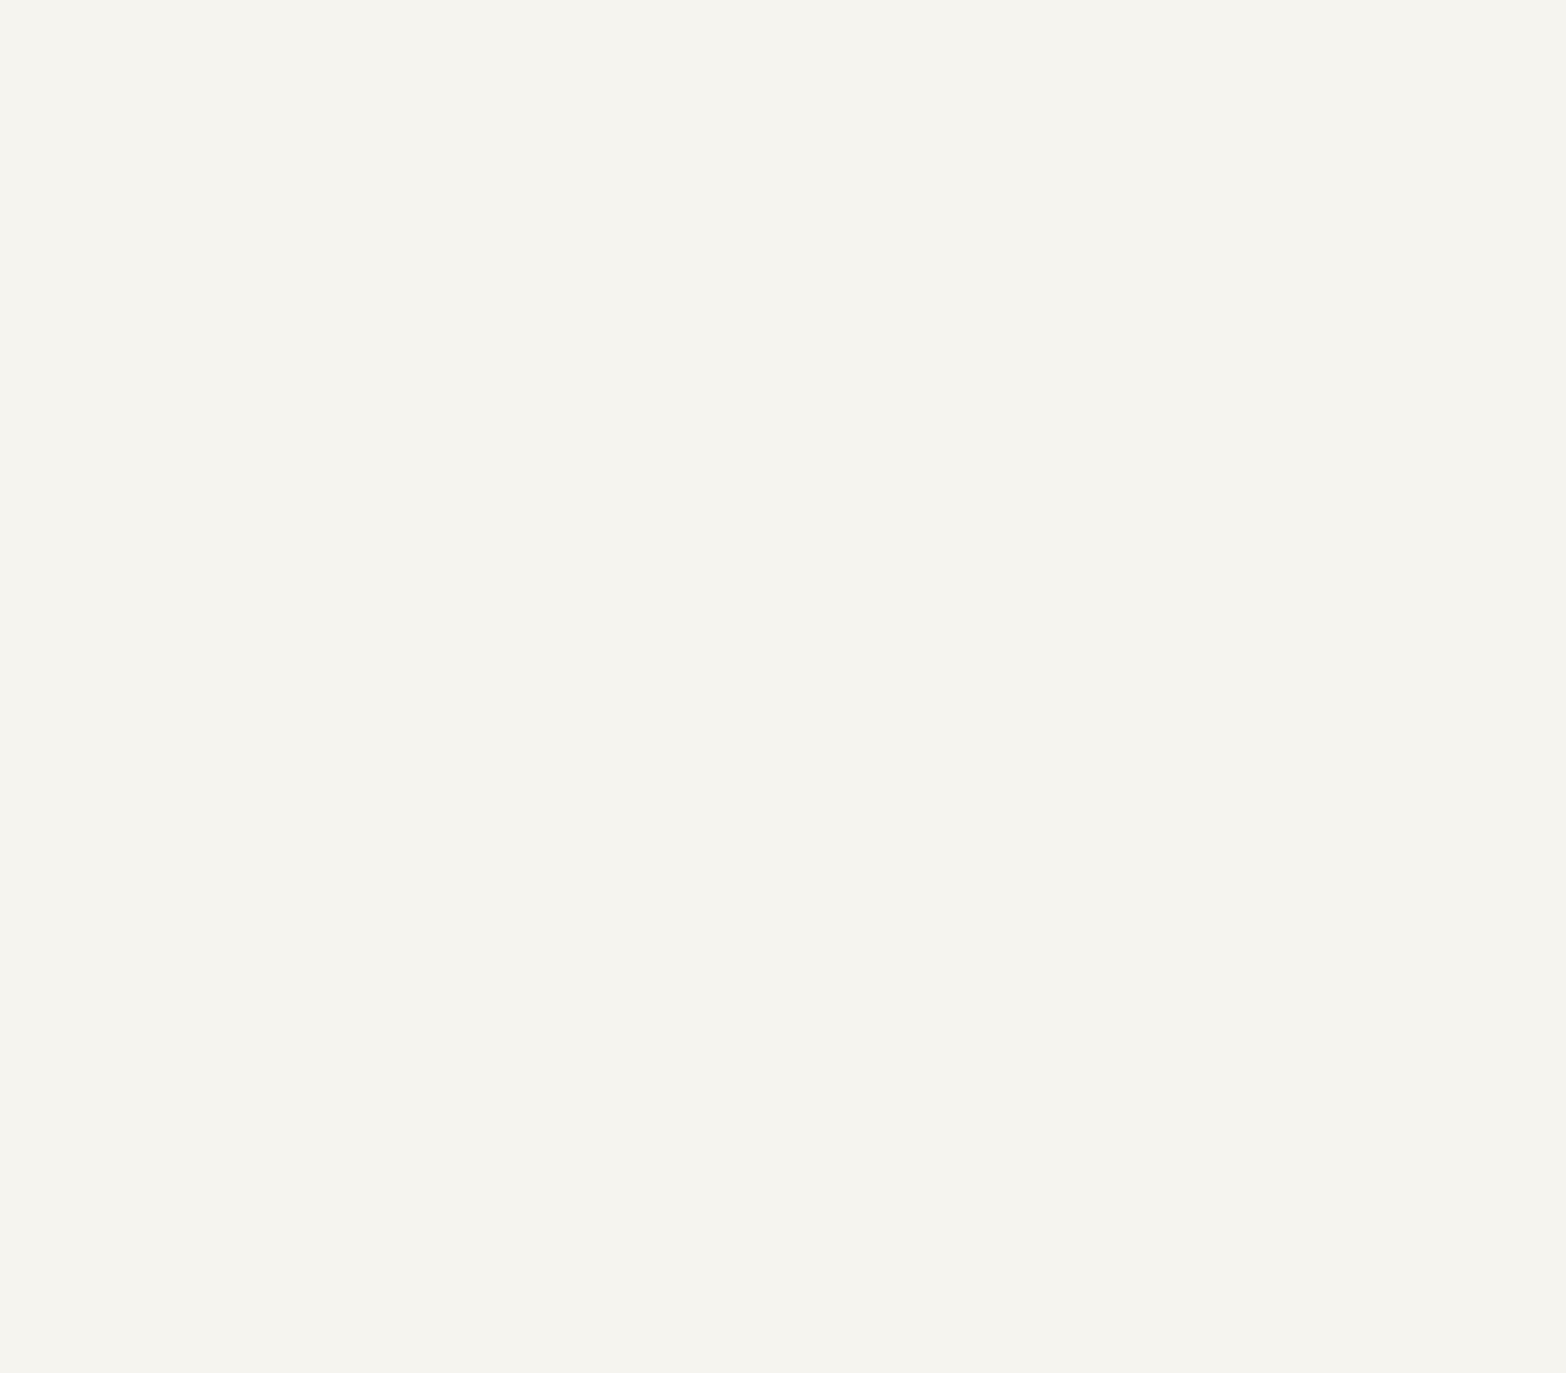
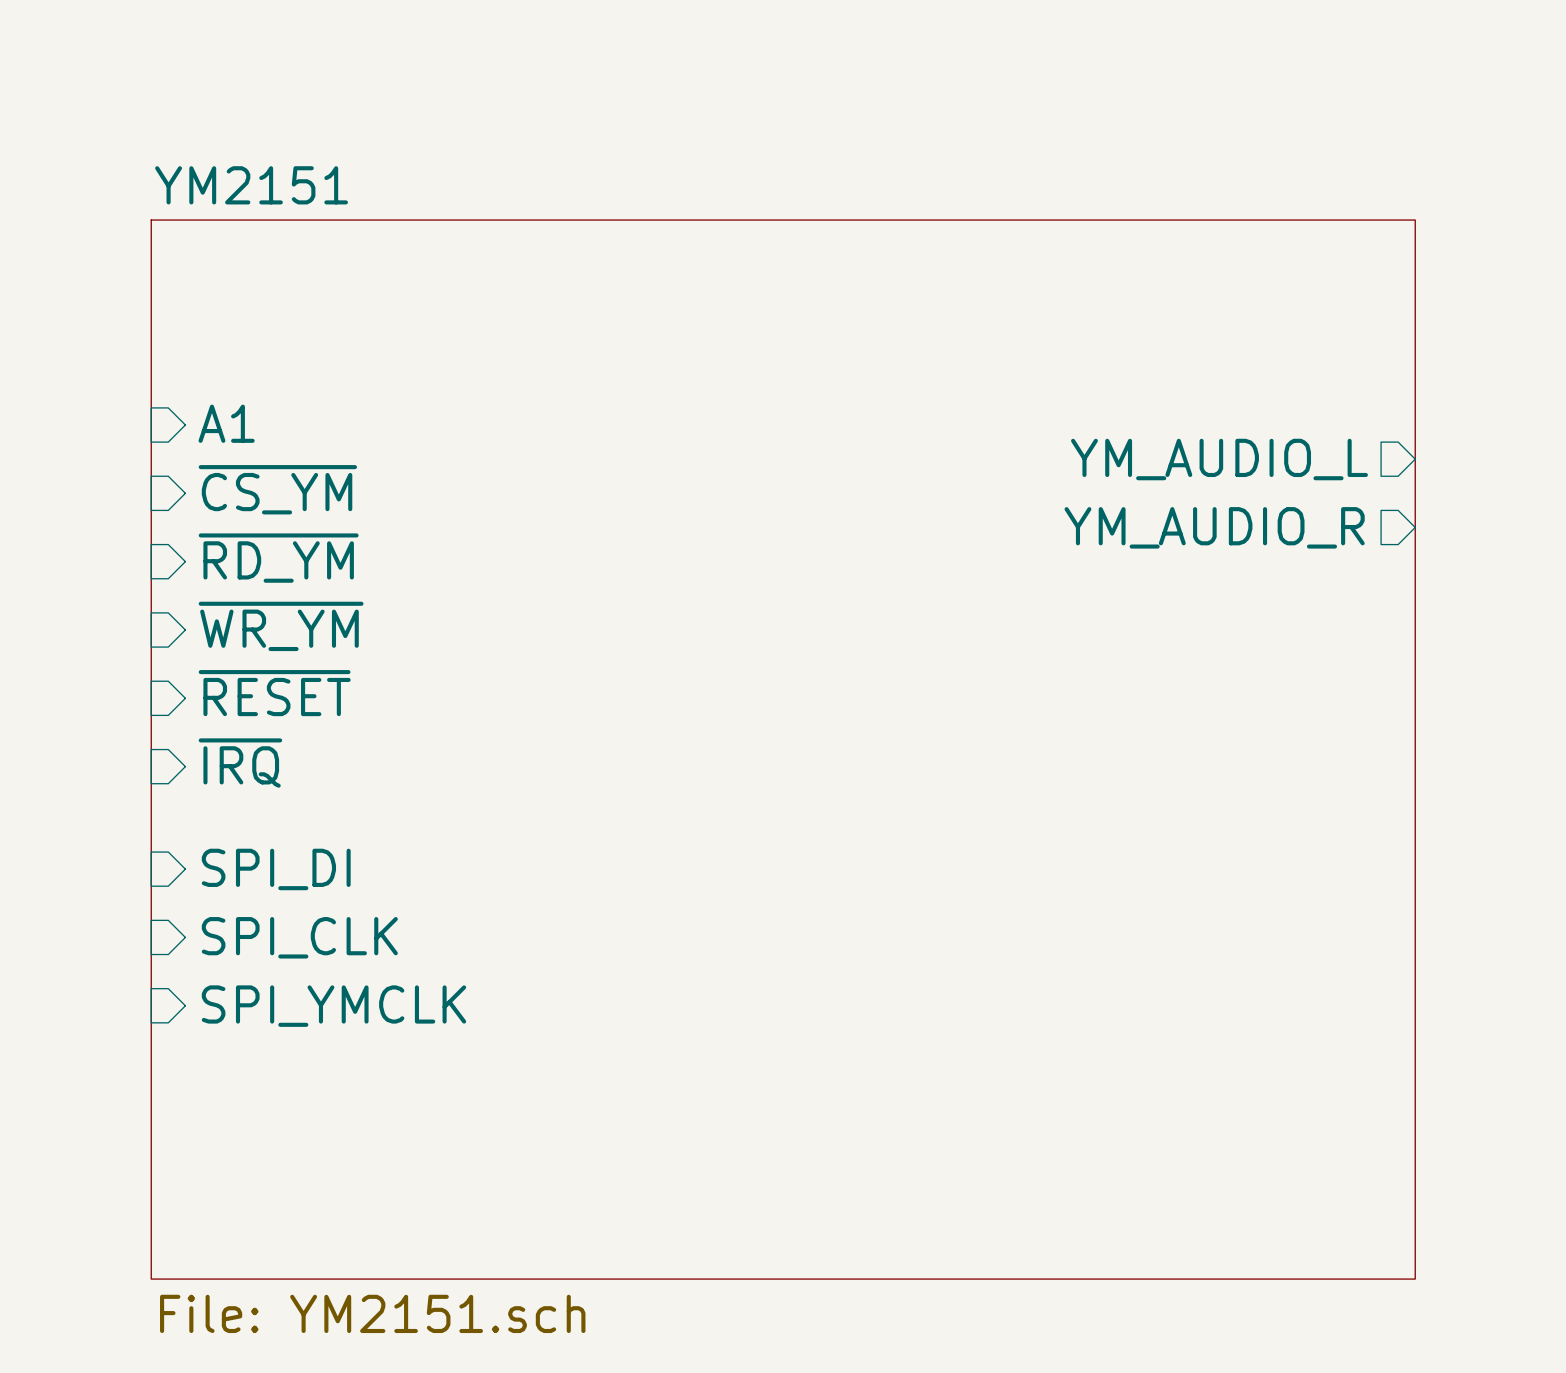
sheet pin: none -> A1 (226, 423)
sheet pin: none -> YM_AUDIO_L (1219, 459)
sheet pin: none -> ~{CS_YM} (277, 489)
sheet pin: none -> YM_AUDIO_R (1214, 527)
sheet pin: none -> ~{RD_YM} (278, 558)
sheet pin: none -> ~{WR_YM} (281, 626)
sheet pin: none -> ~{RESET} (274, 693)
sheet YM2151: none -> File: YM2151.sch (783, 749)
sheet pin: none -> ~{IRQ} (240, 763)
sheet pin: none -> SPI_DI (276, 869)
sheet pin: none -> SPI_CLK (299, 937)
sheet pin: none -> SPI_YMCLK (333, 1006)

